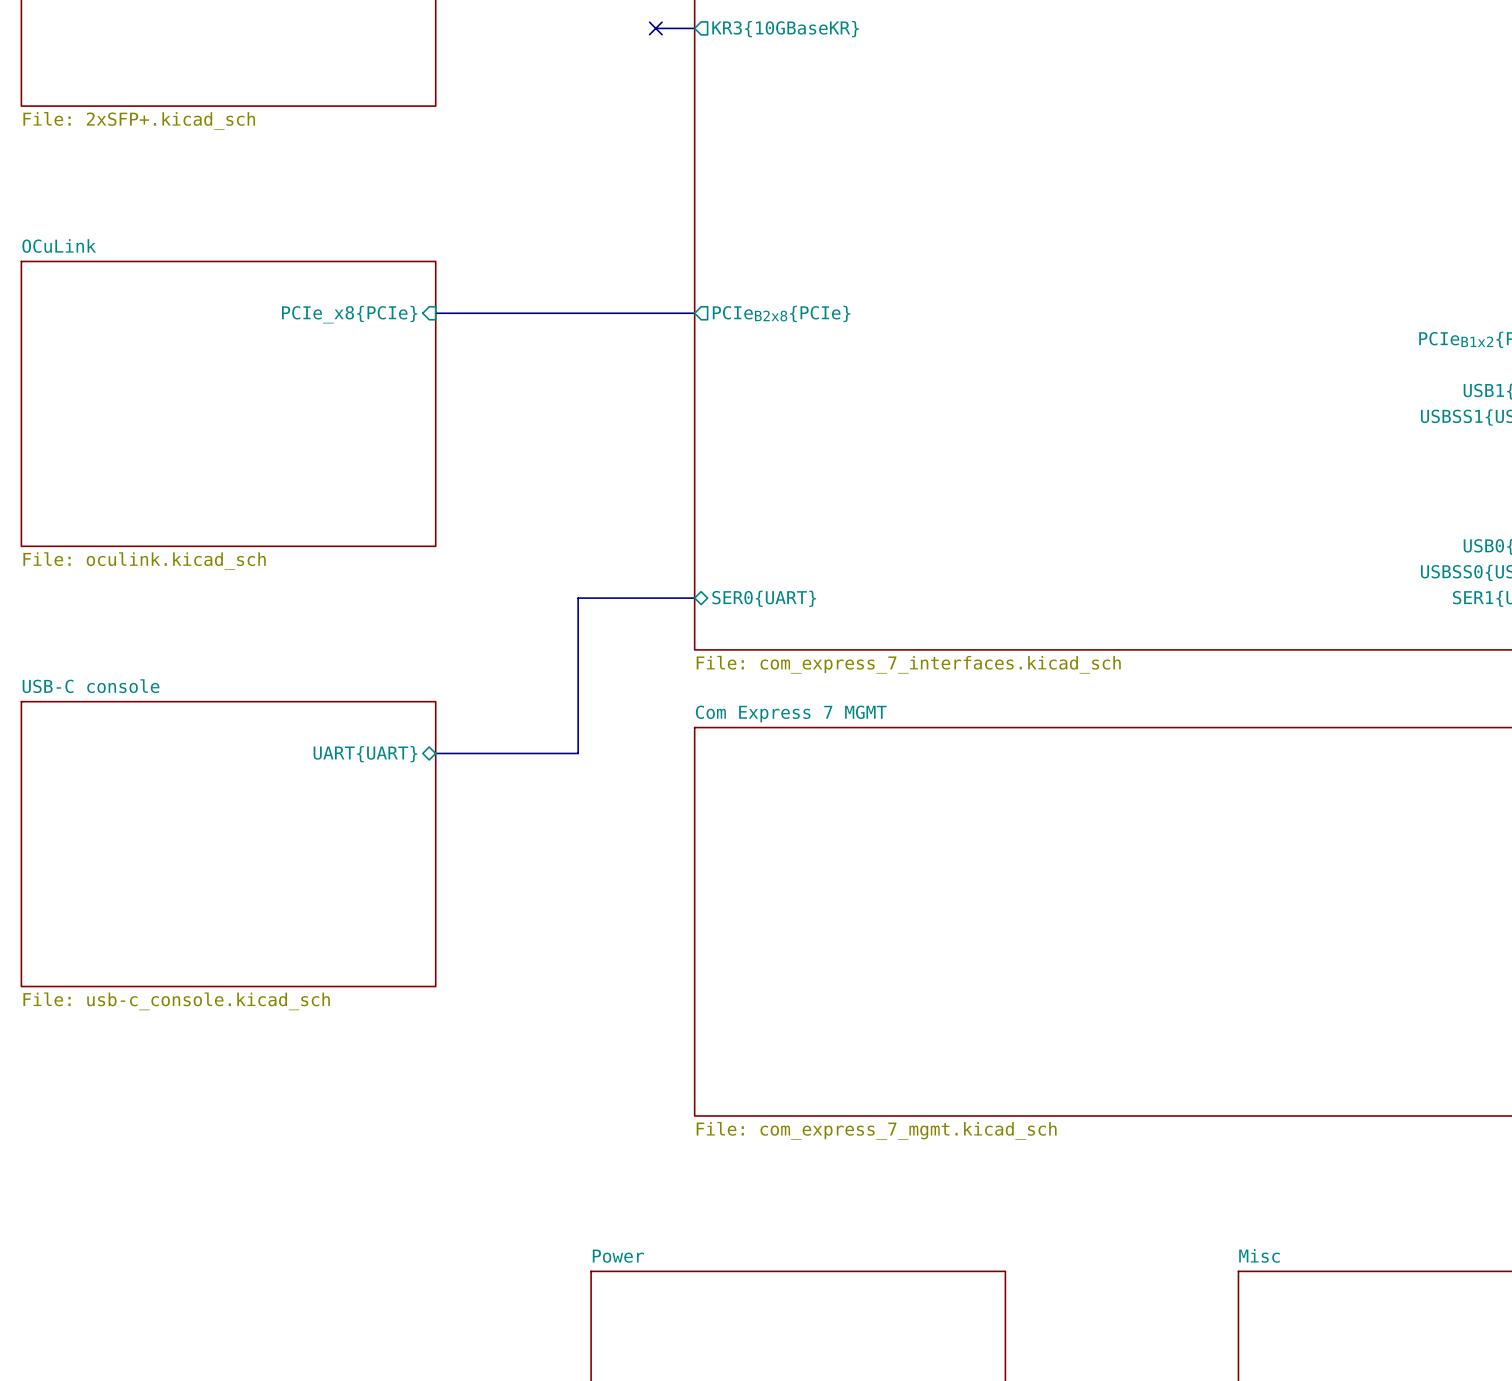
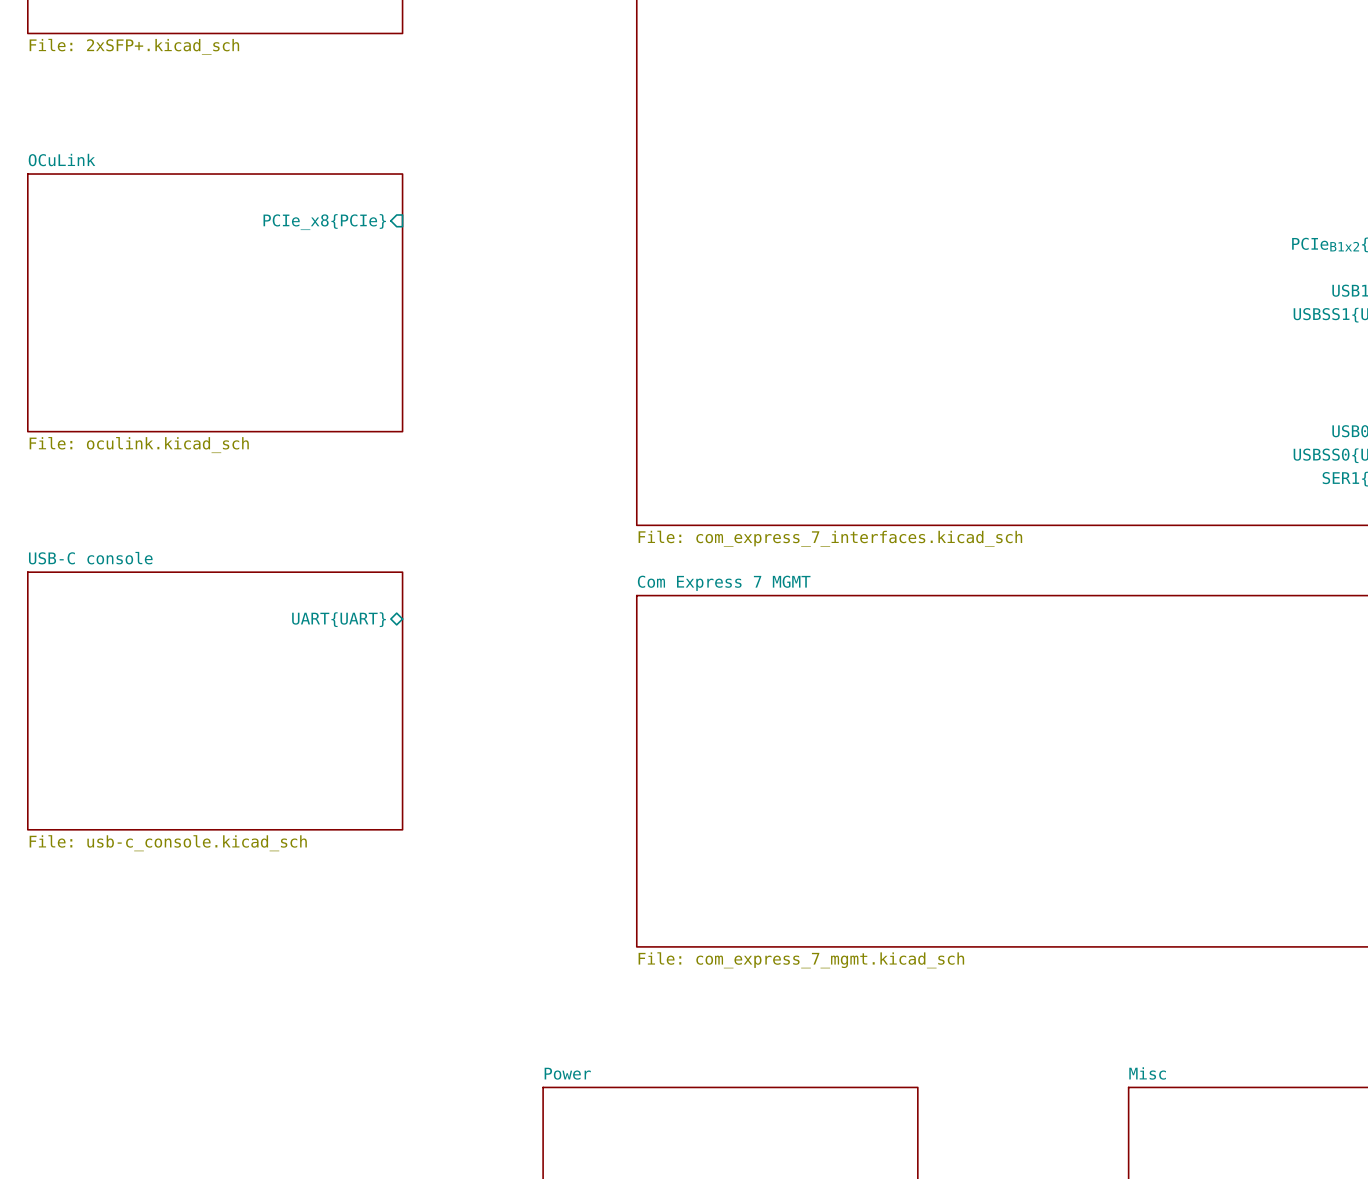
bus: (435, 313) (694, 313) -> none
sheet pin: PCIeB2x8{PCIe} (781, 313) -> none
bus: (694, 598) (578, 598) (578, 753) (435, 753) -> none
sheet pin: SER0{UART} (764, 598) -> none

